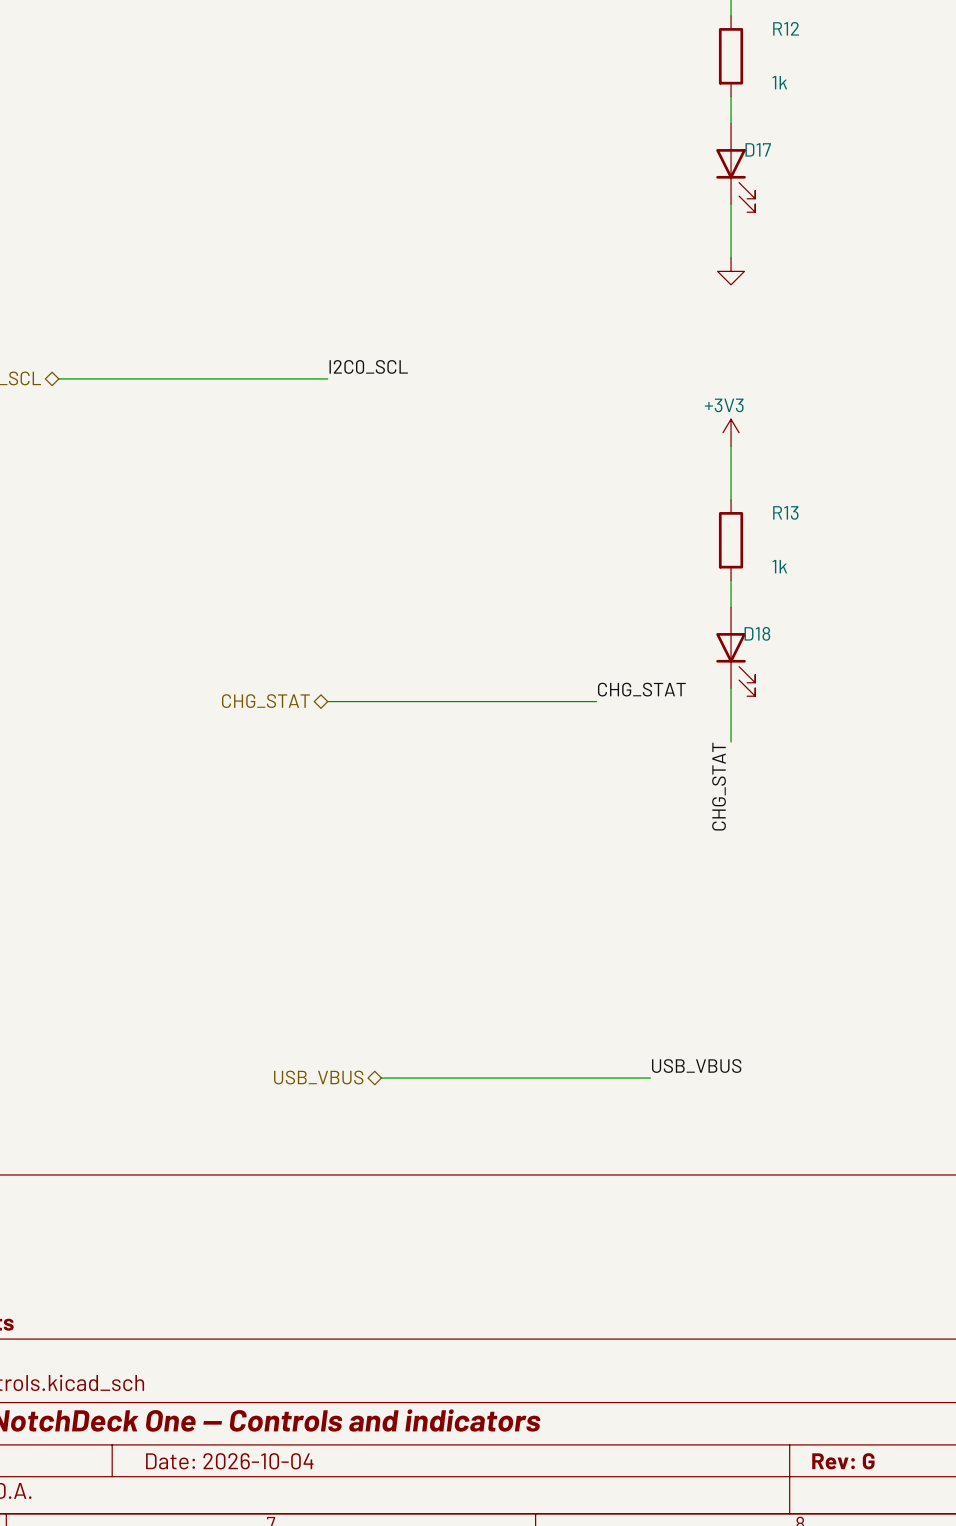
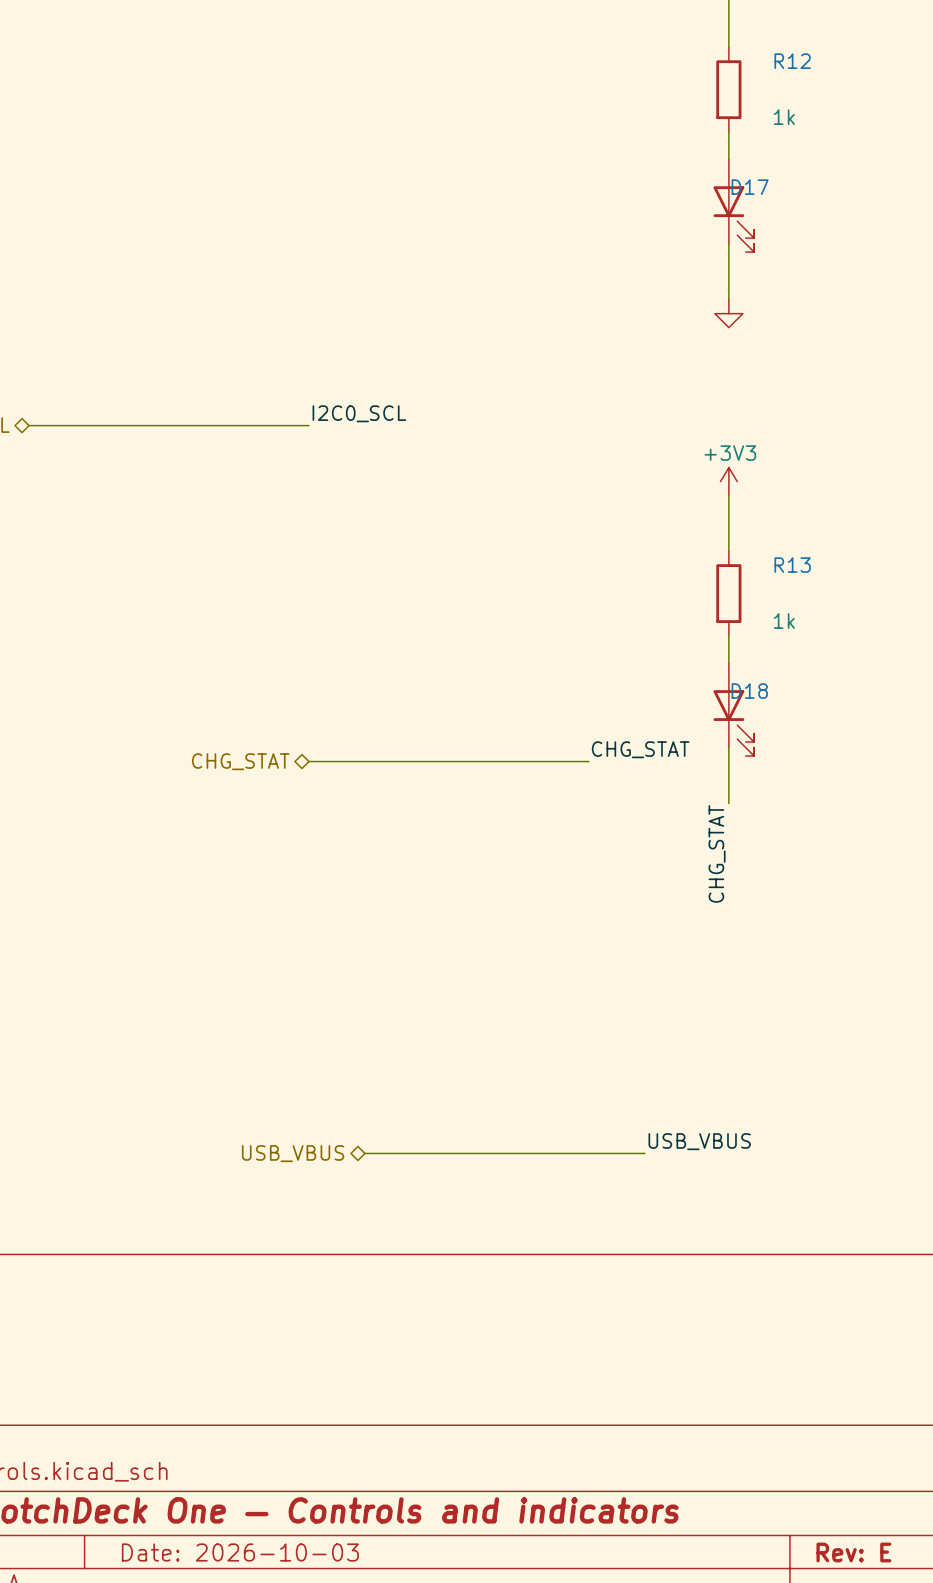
title block: Date: 2026-10-04 (229, 1461) -> Date: 2026-10-03 (240, 1552)
title block: Rev: G (843, 1461) -> Rev: E (853, 1552)

